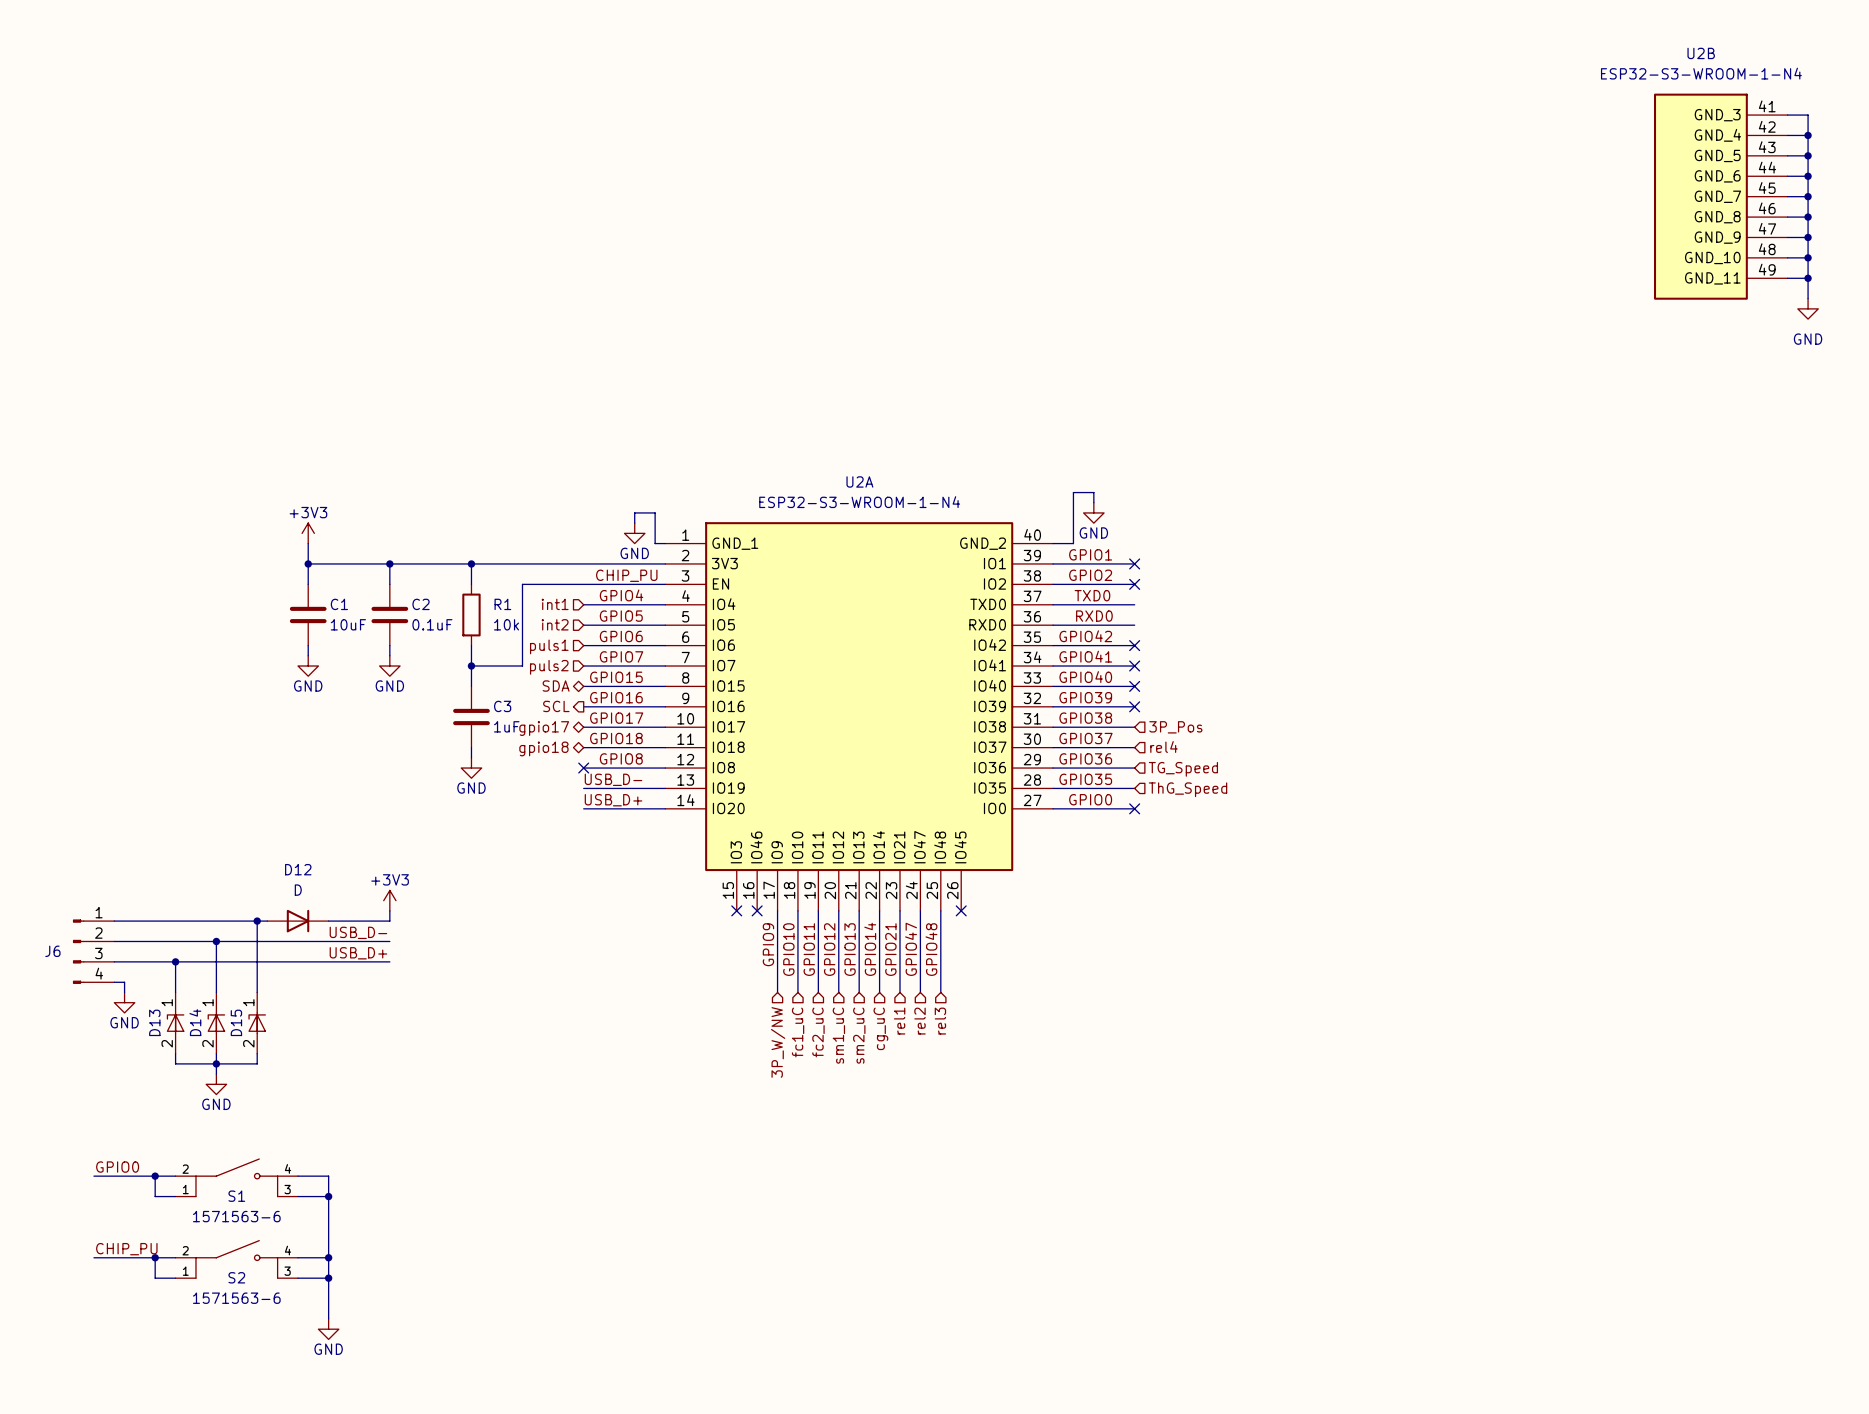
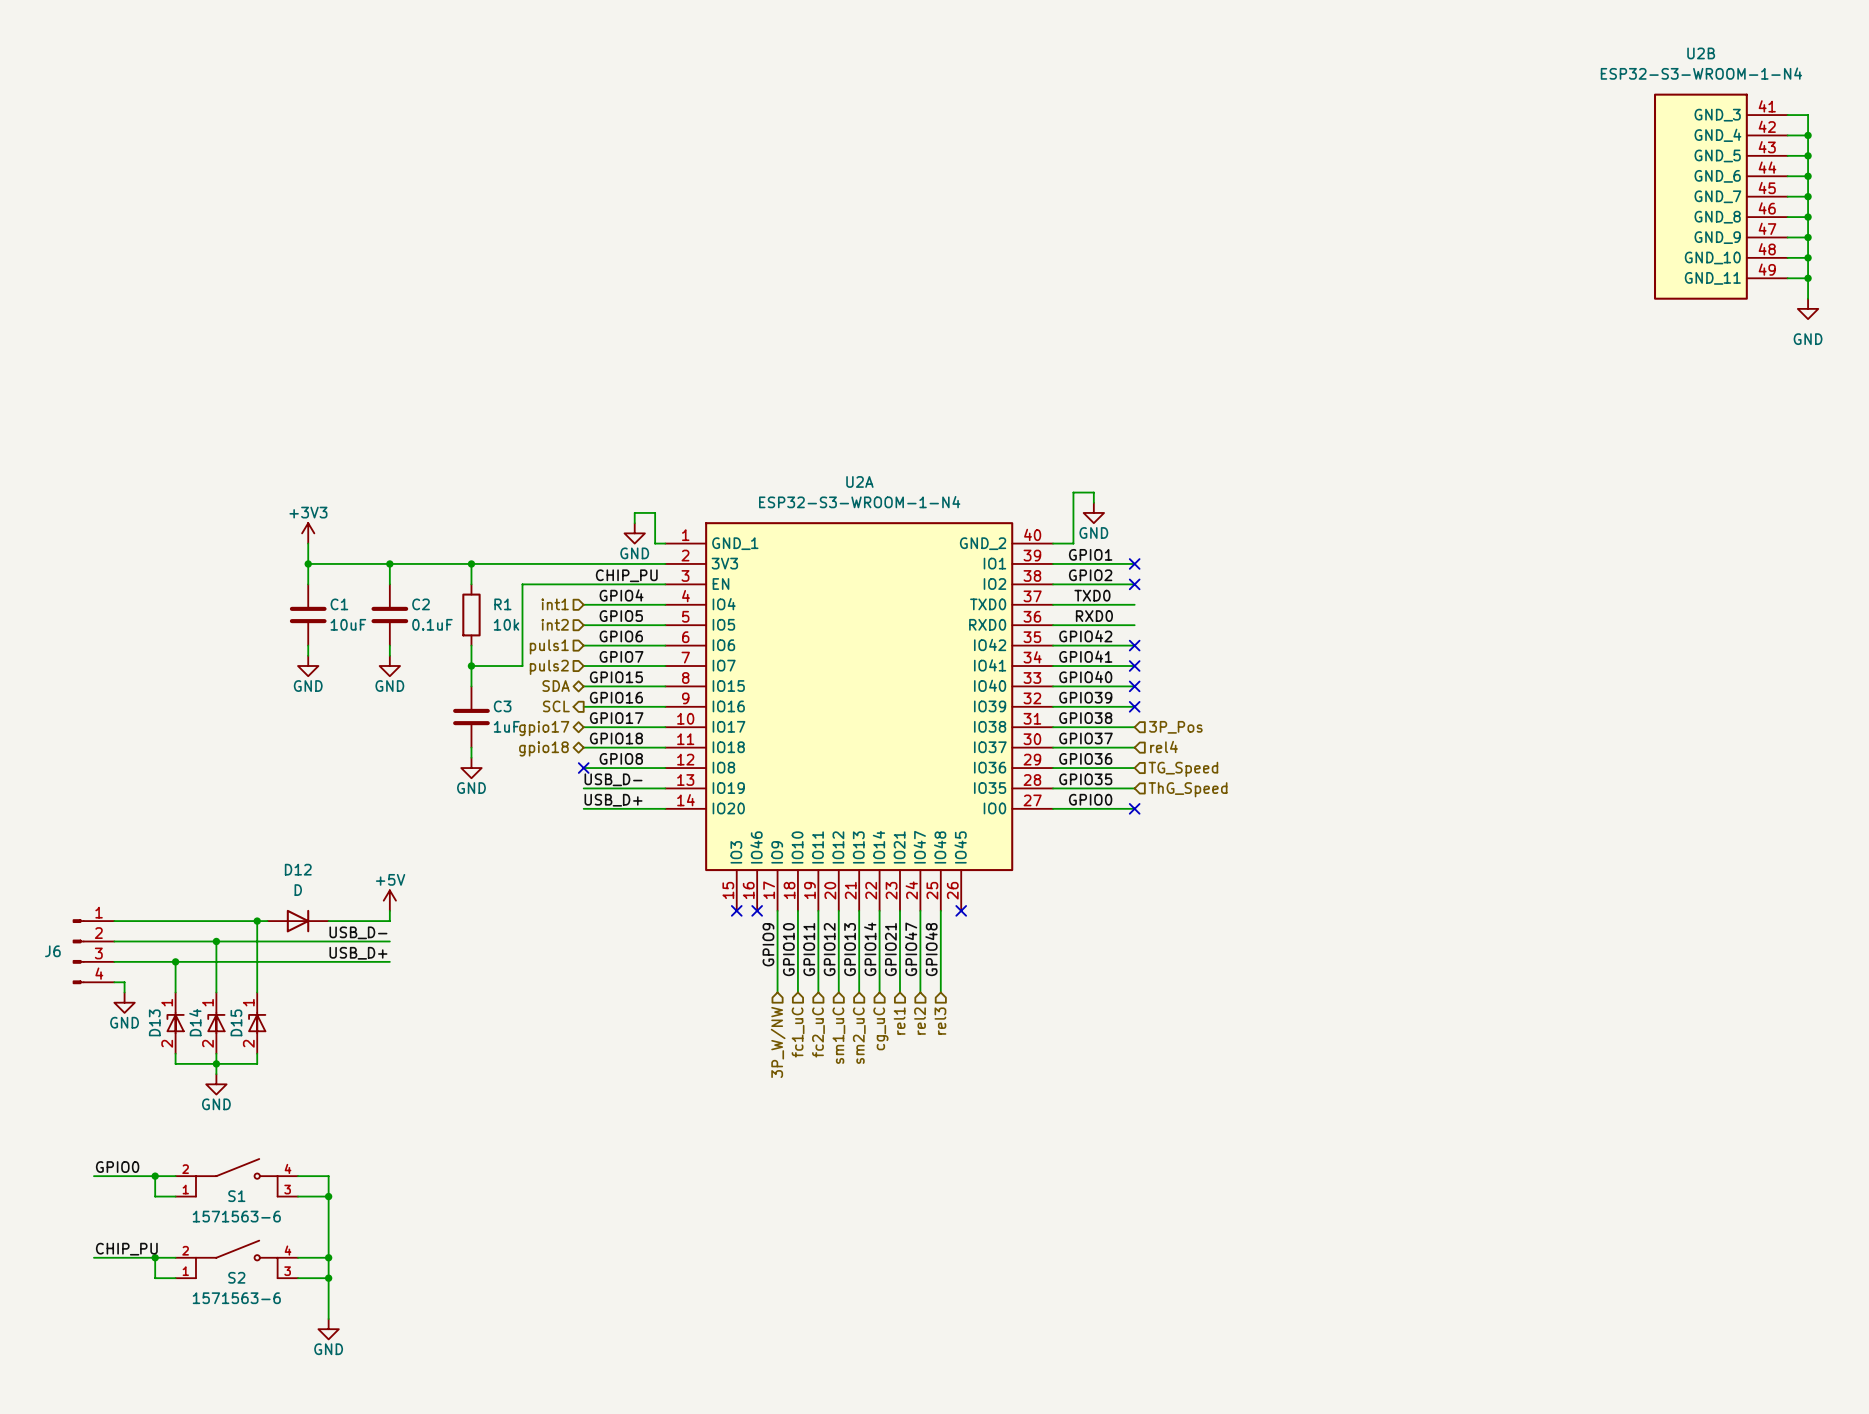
power symbol: +3V3 (389, 900) -> +5V (389, 900)

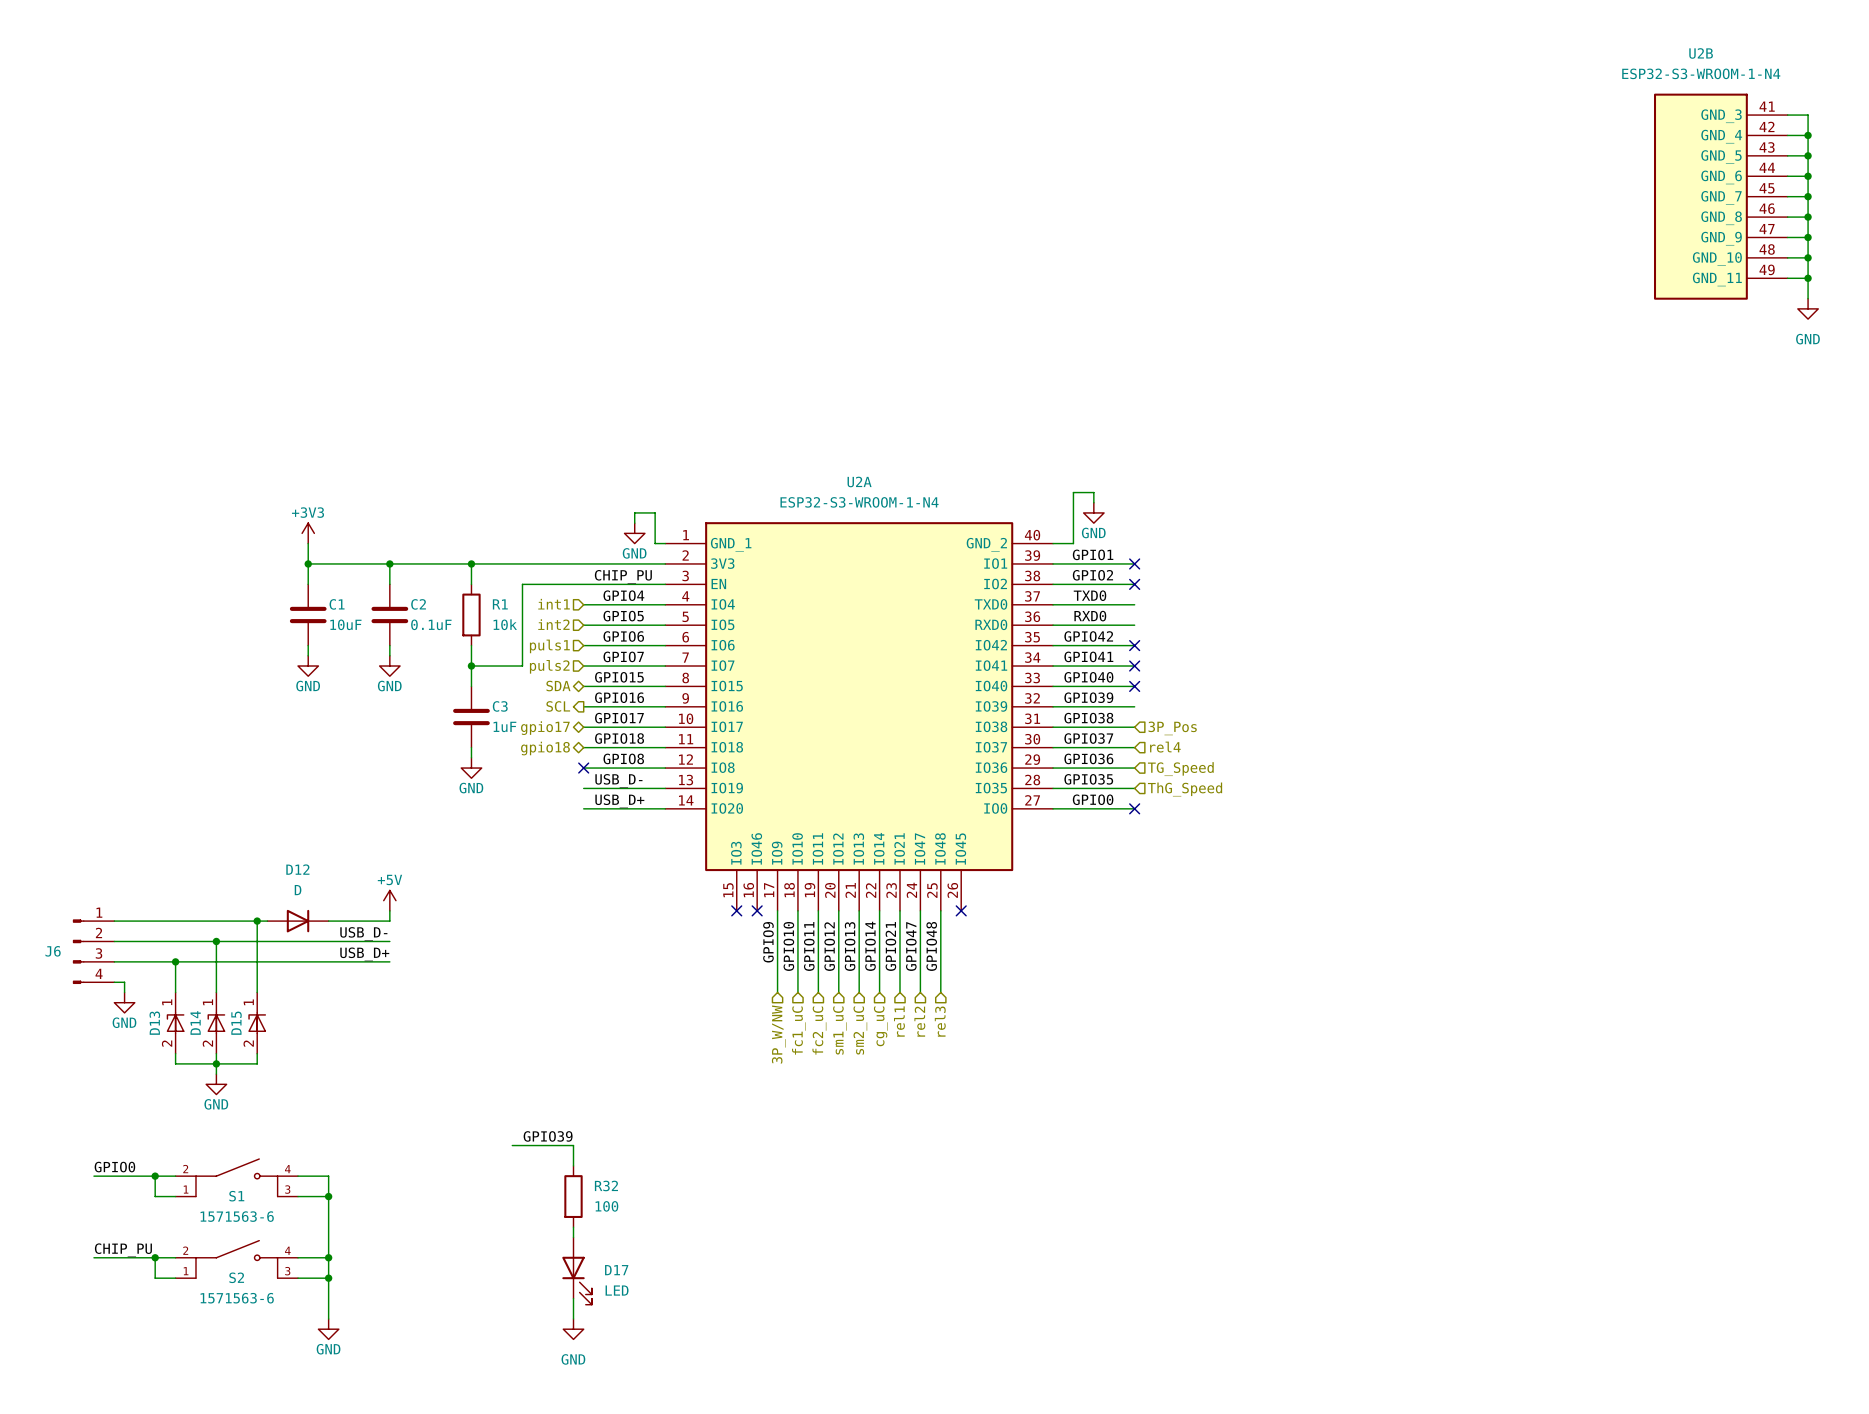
no-connect mark: (1134, 706) -> none
label: none -> GPIO39 (548, 1136)
wire: none -> (512, 1145) (573, 1145) (573, 1165)
R32: none -> 100 (573, 1196)
wire: none -> (573, 1227) (573, 1237)
D17: none -> LED (577, 1271)
wire: none -> (573, 1298) (573, 1318)
power symbol: none -> GND (573, 1329)

